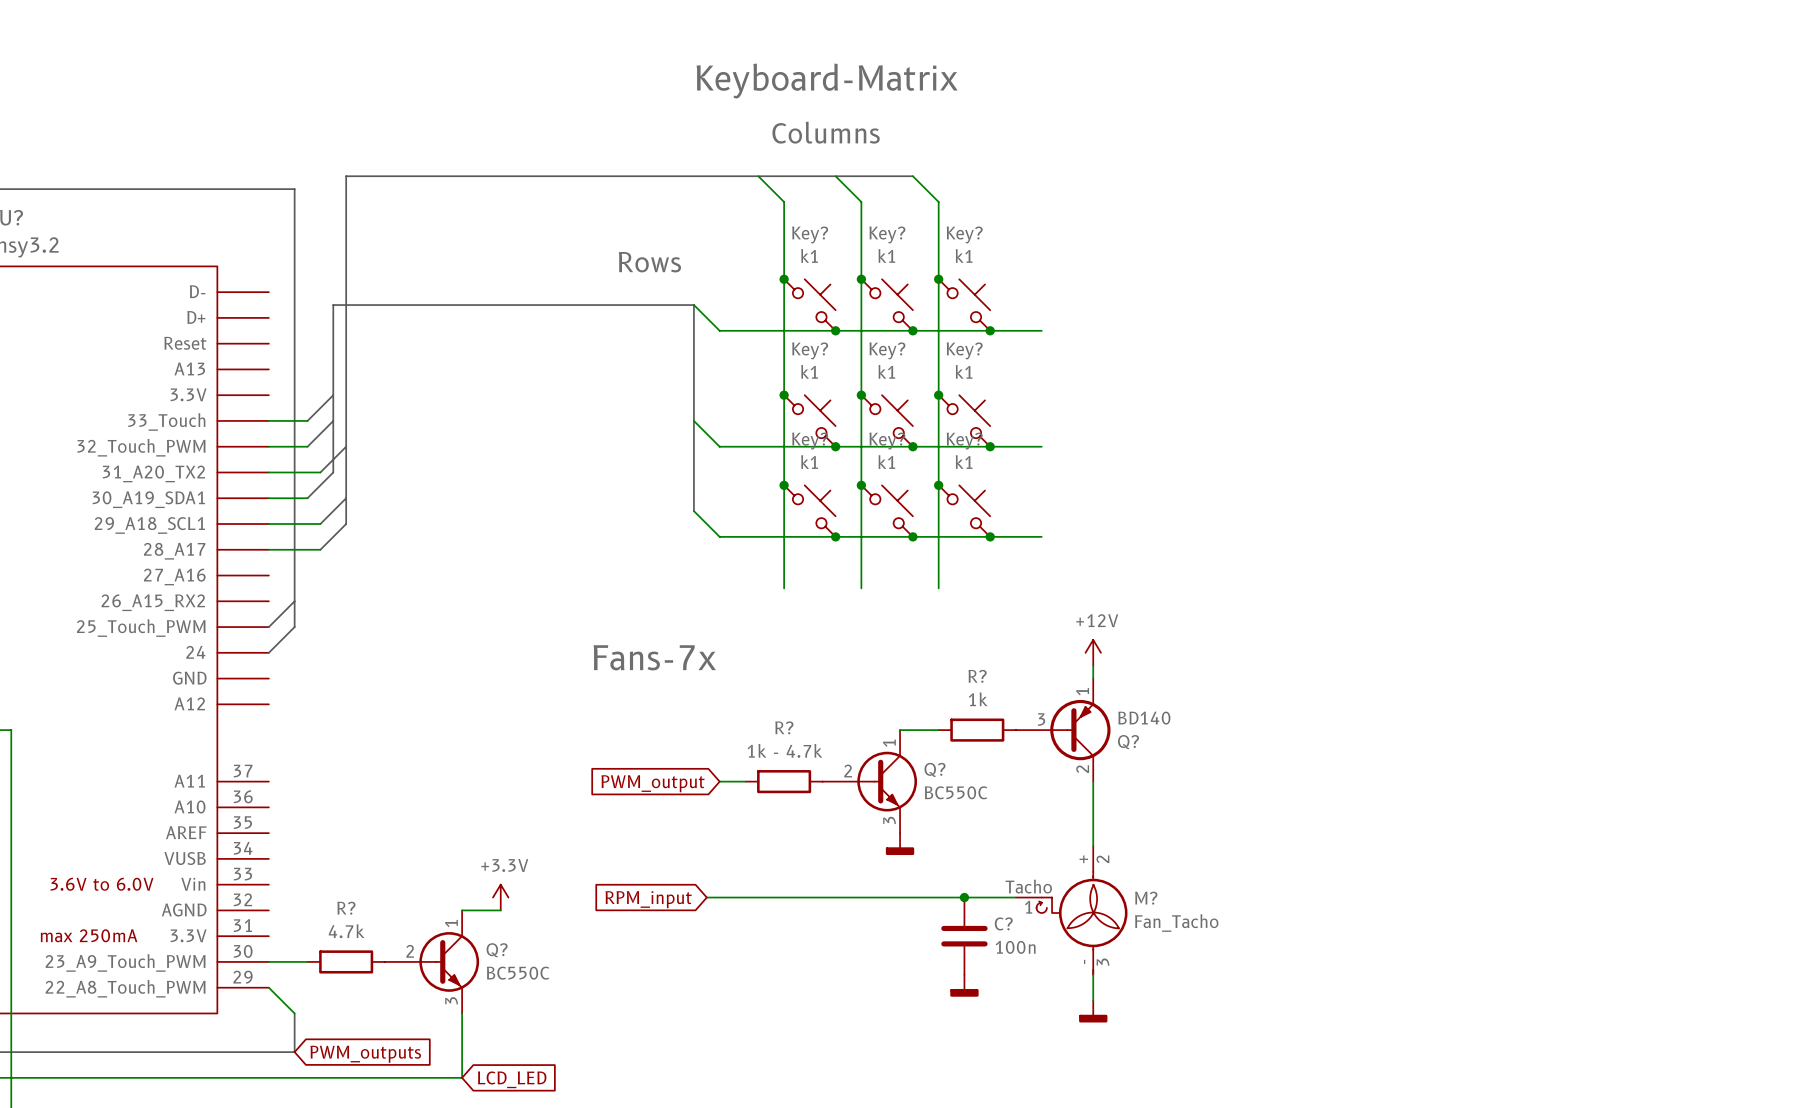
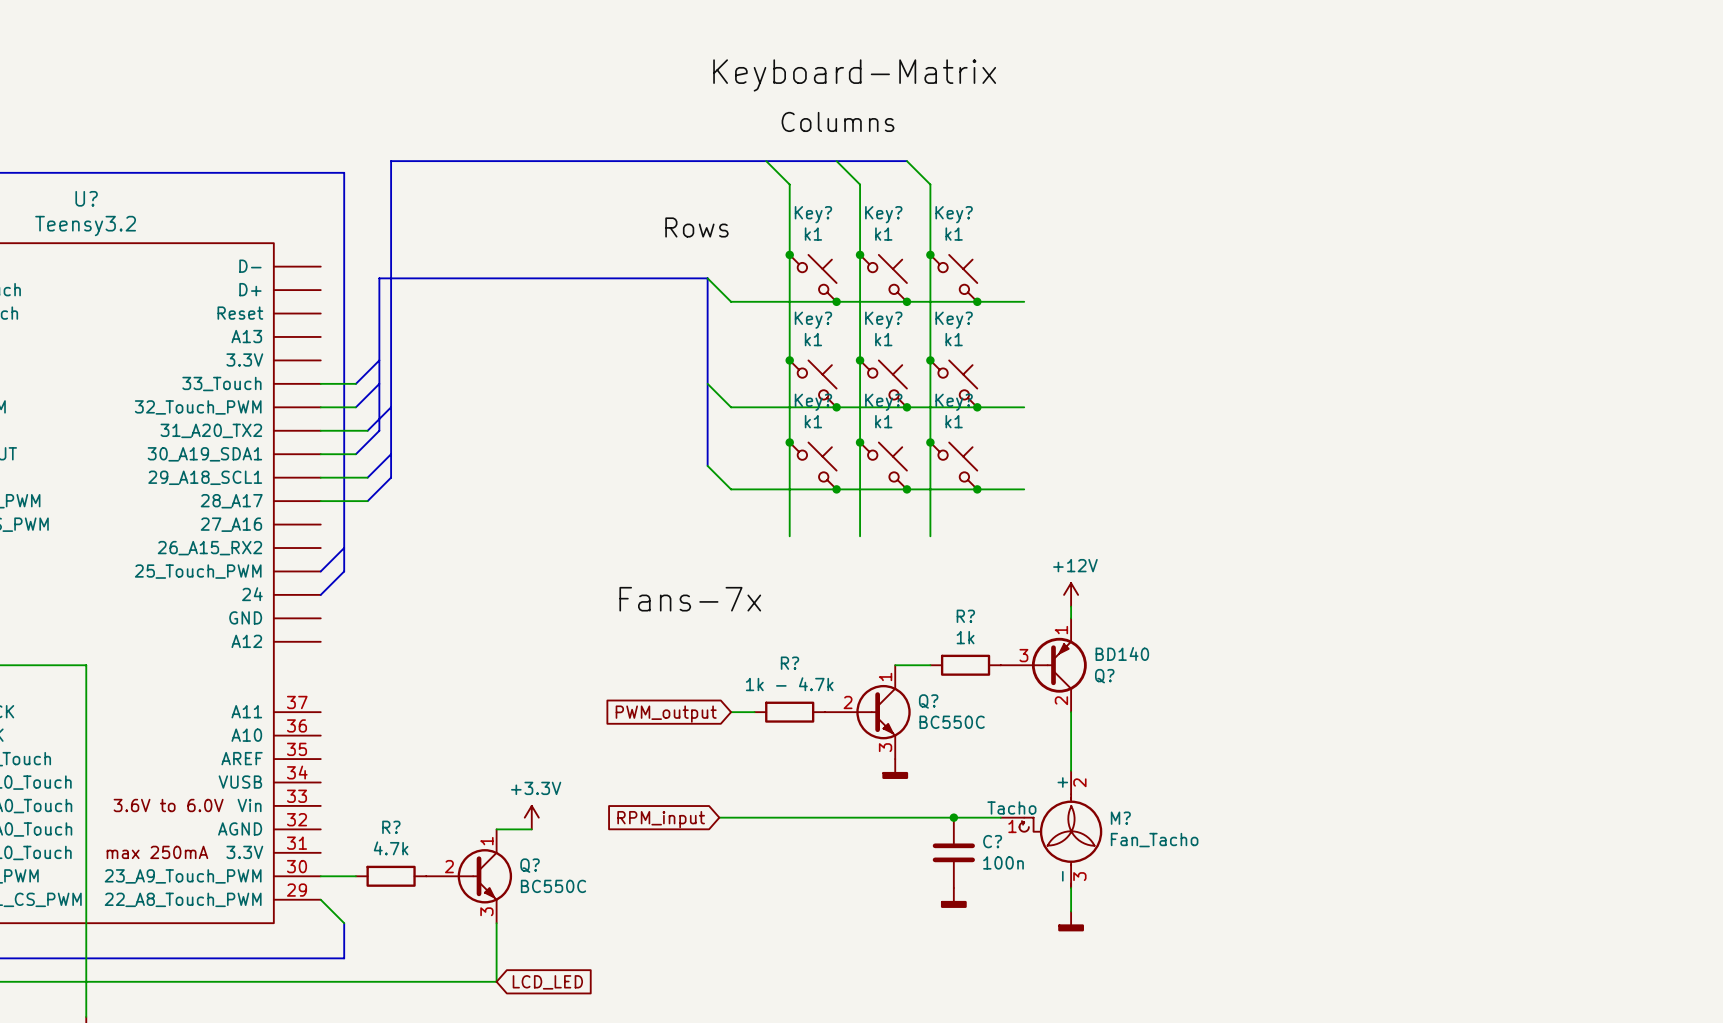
label position: Rows (649, 262) -> Rows (696, 227)
global label: PWM_outputs (365, 1054) -> none

